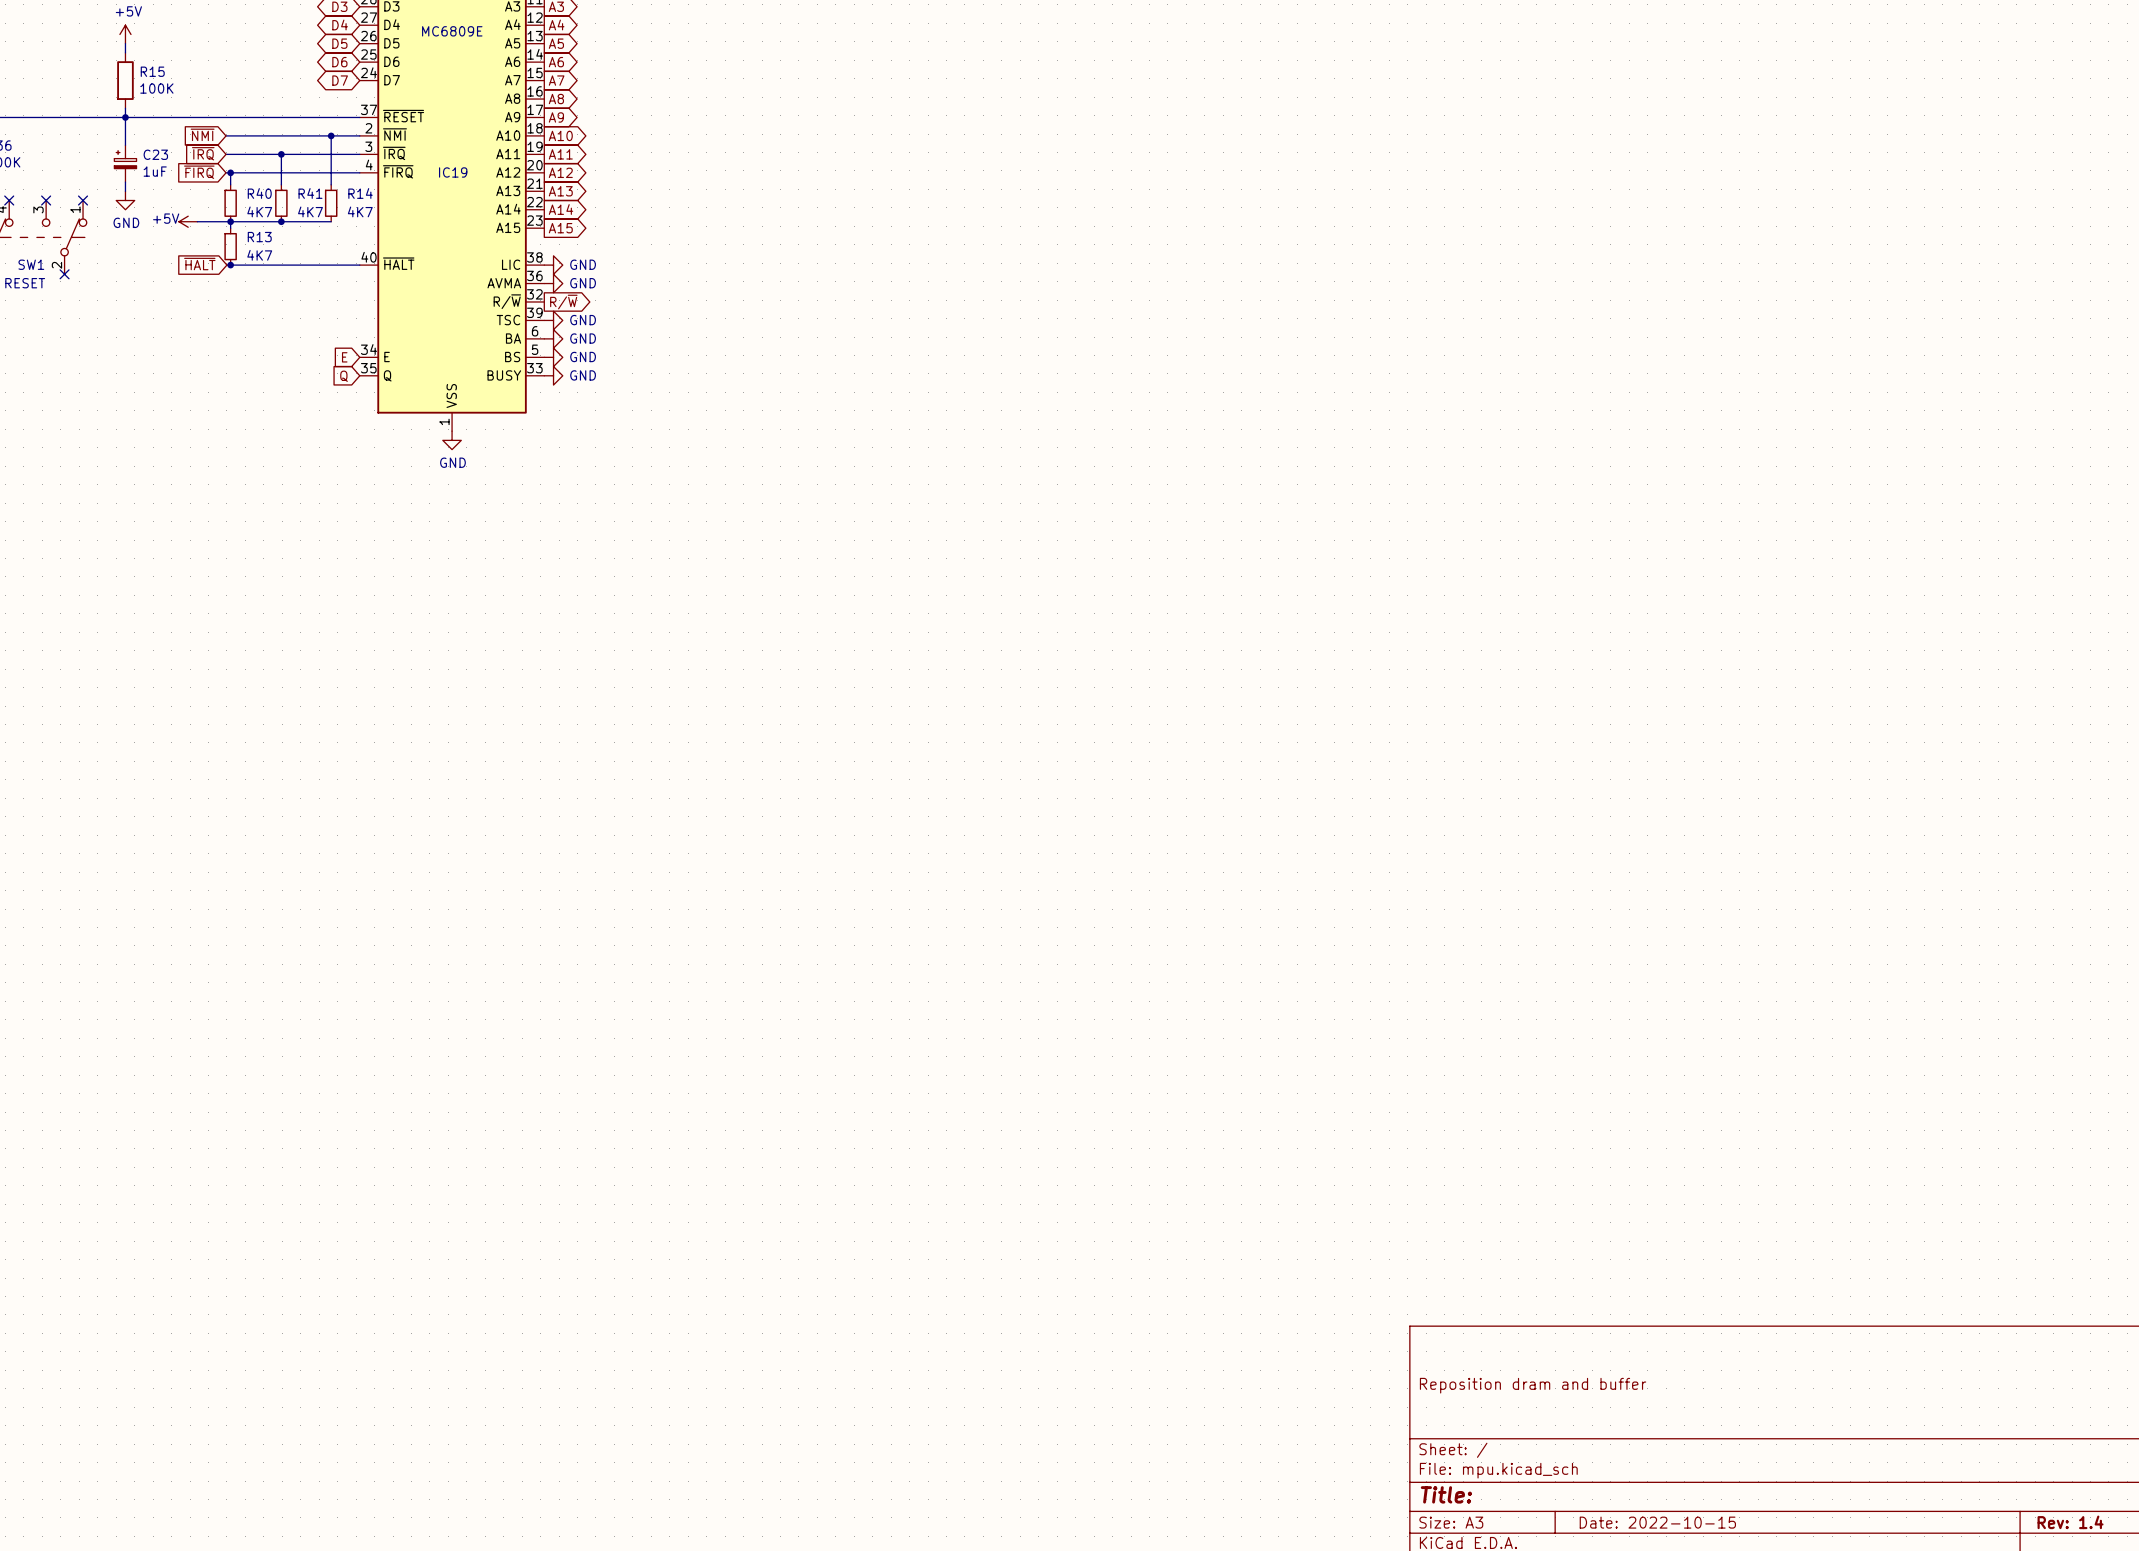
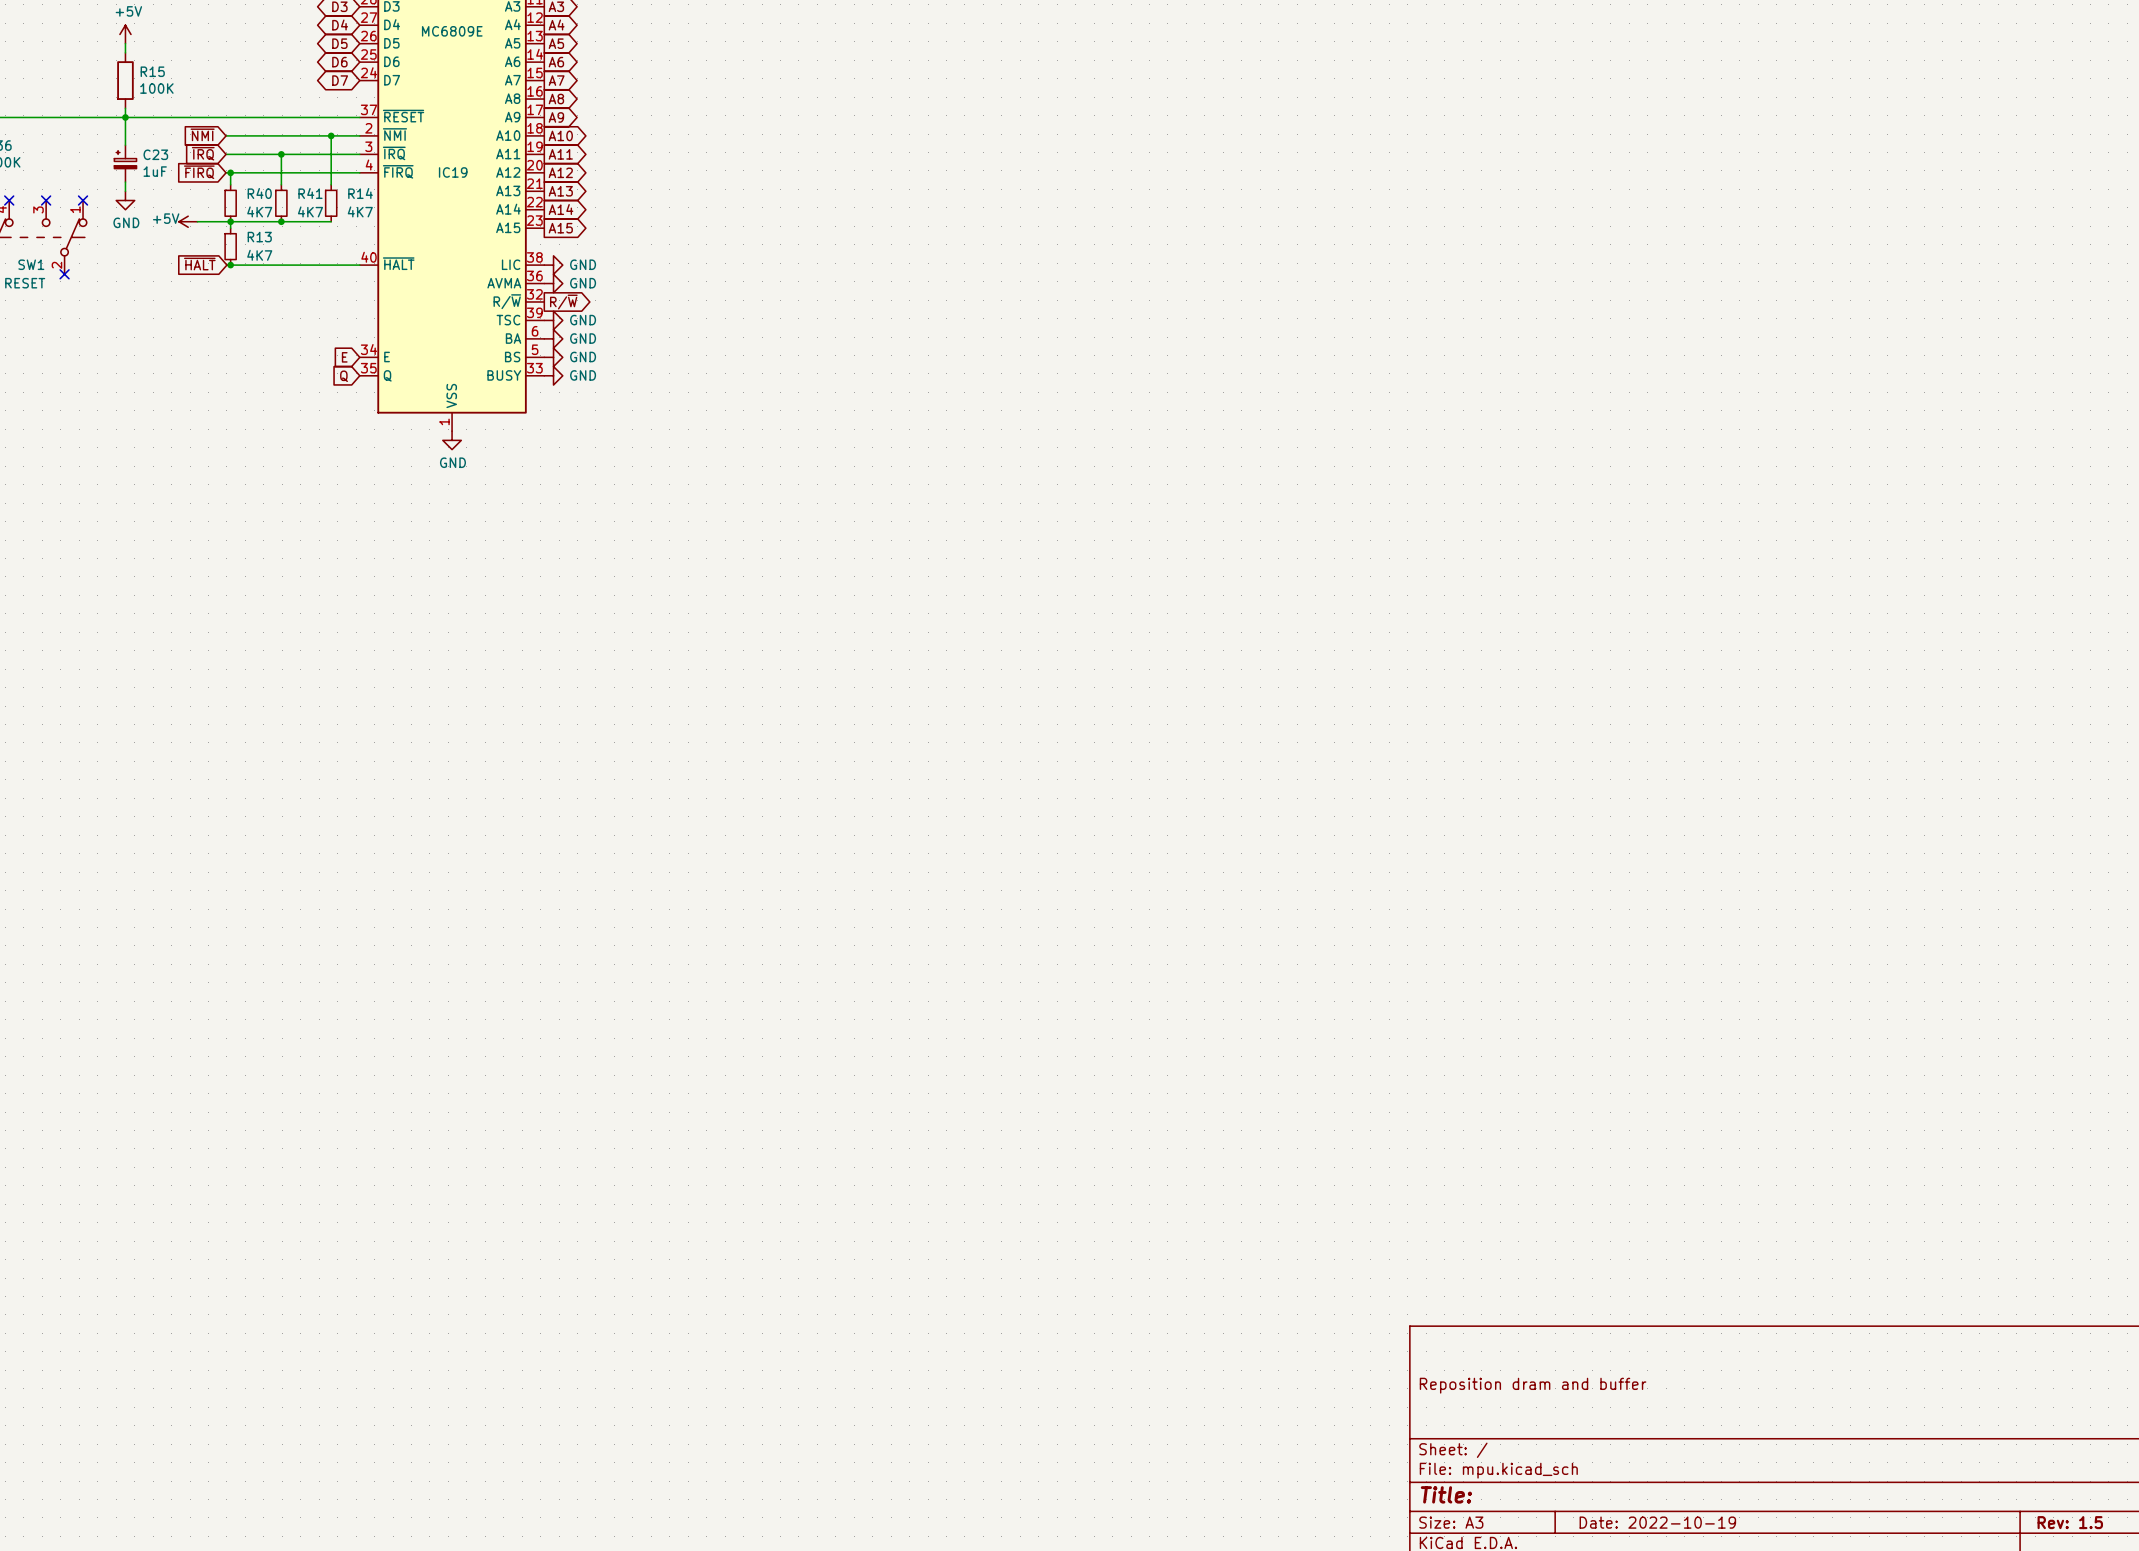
title block: Date: 2022-10-15 (1657, 1522) -> Date: 2022-10-19 (1657, 1522)
title block: Rev: 1.4 (2070, 1522) -> Rev: 1.5 (2070, 1522)

